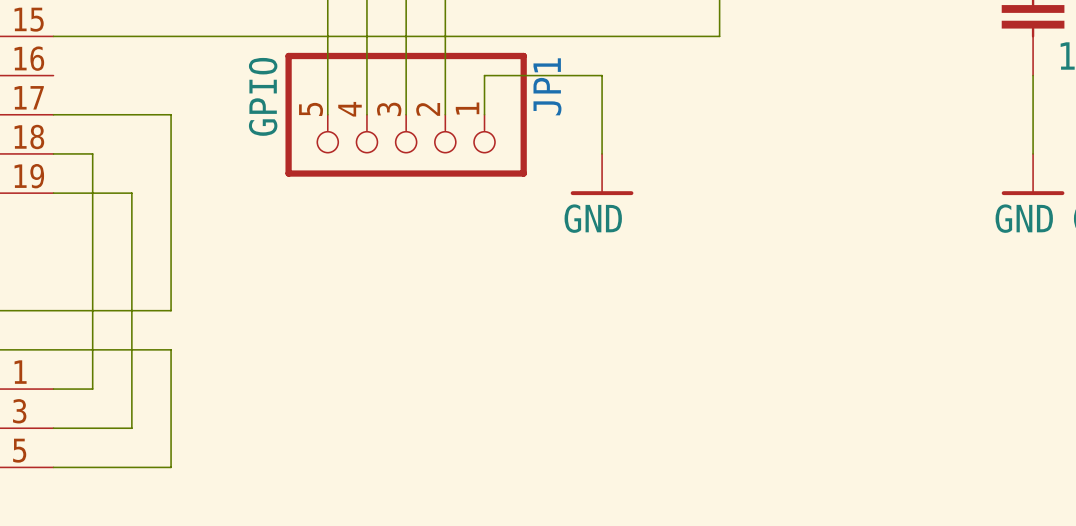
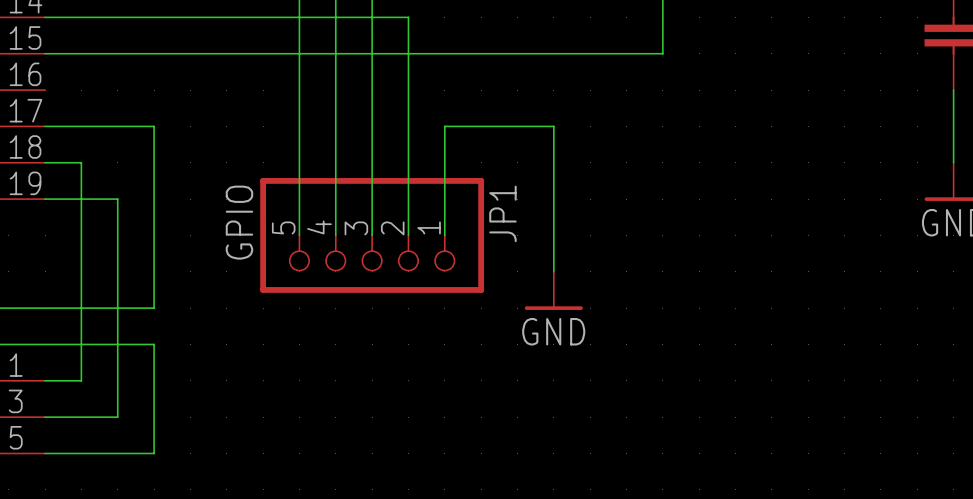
wire: none -> (299, 126) (299, 235)
wire: none -> (335, 126) (335, 235)
wire: none -> (372, 126) (372, 235)
JP1 position: (406, 114) -> (372, 235)
wire: none -> (408, 126) (408, 235)
wire: (484, 114) (484, 75) (602, 75) (602, 114) -> (444, 235) (444, 126) (553, 126)
wire: none -> (553, 162) (553, 271)
power symbol position: GND (602, 174) -> GND (553, 290)

